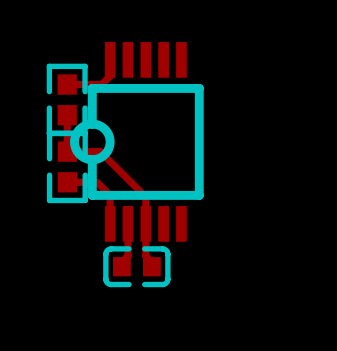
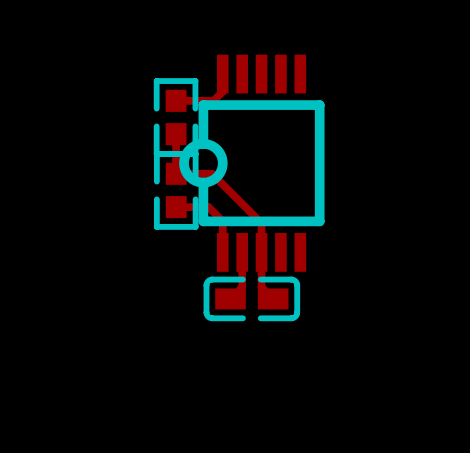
part footprint: [103, 246, 171, 288] -> [203, 276, 301, 322]

